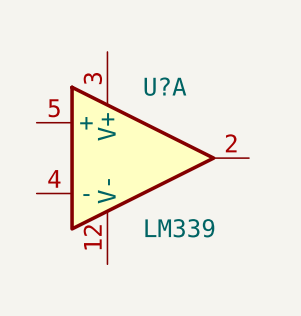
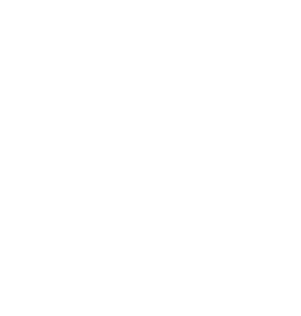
U?A: LM339 (142, 158) -> none

